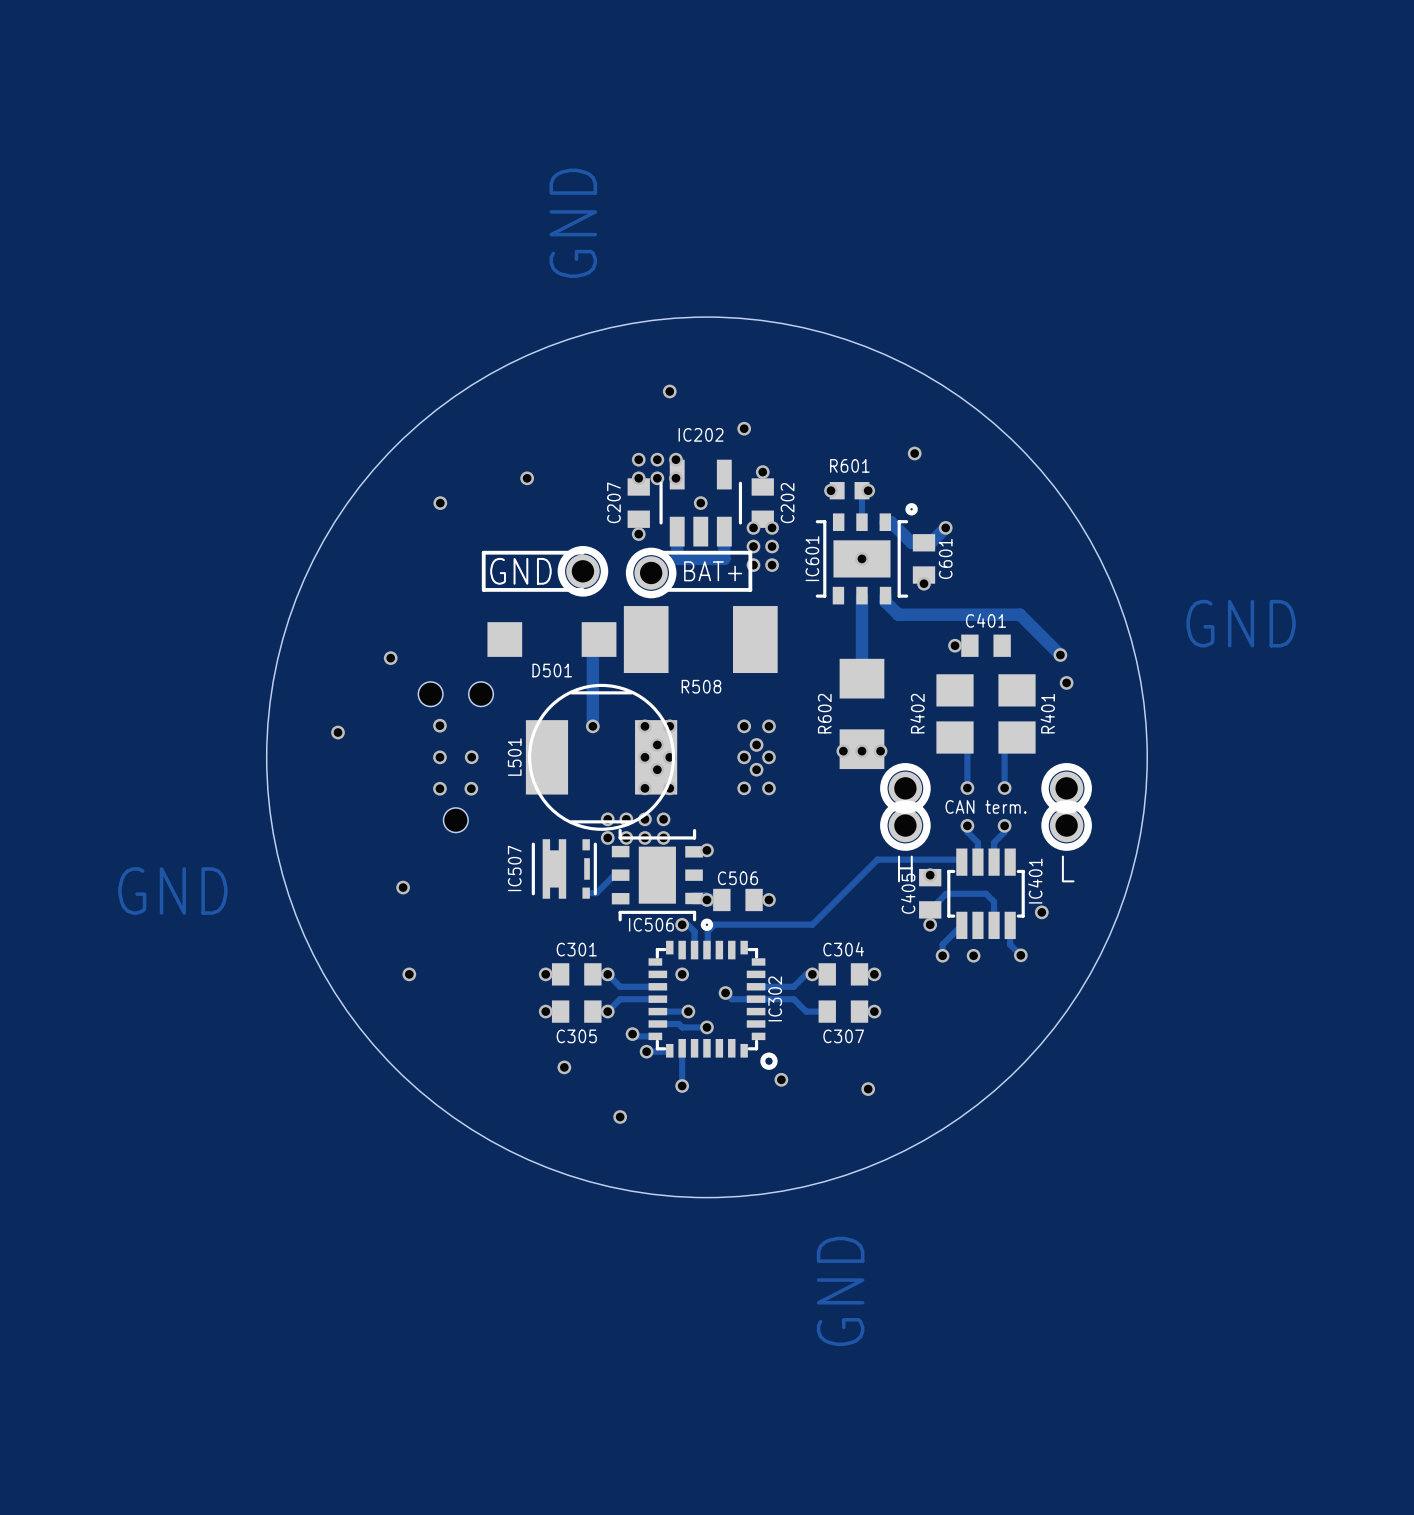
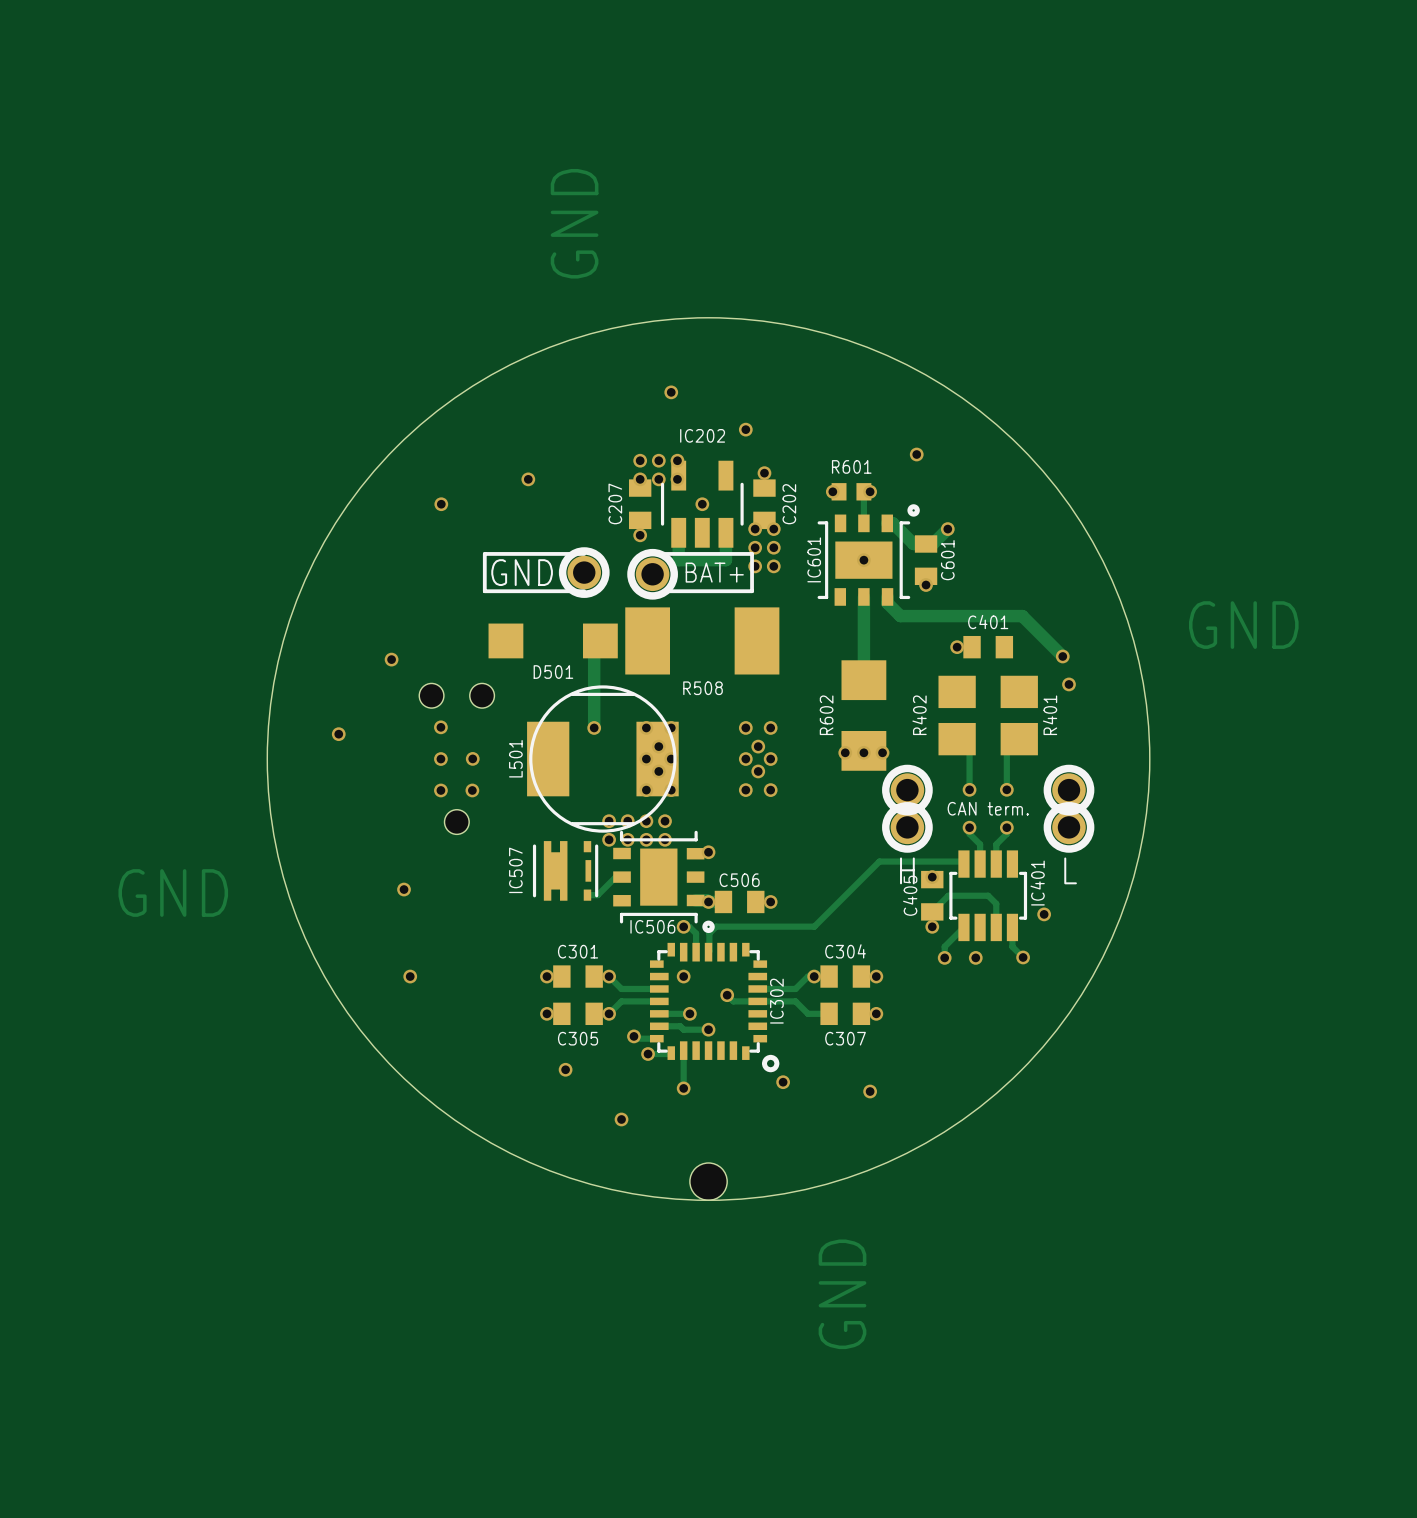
hole: none -> (708, 1181)

